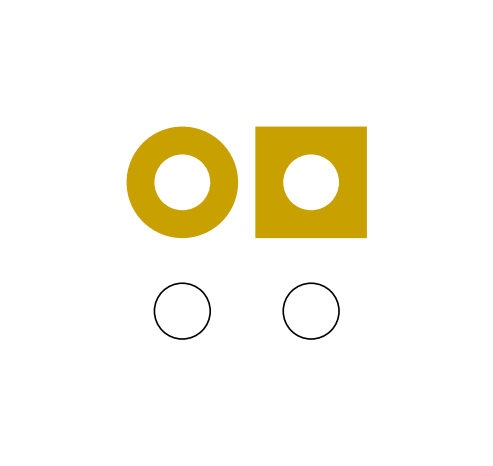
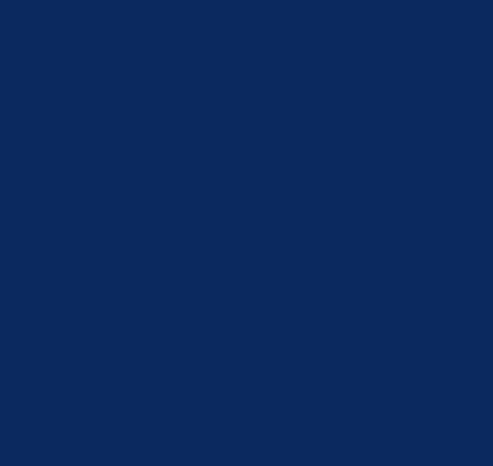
part: (246, 232) -> none

